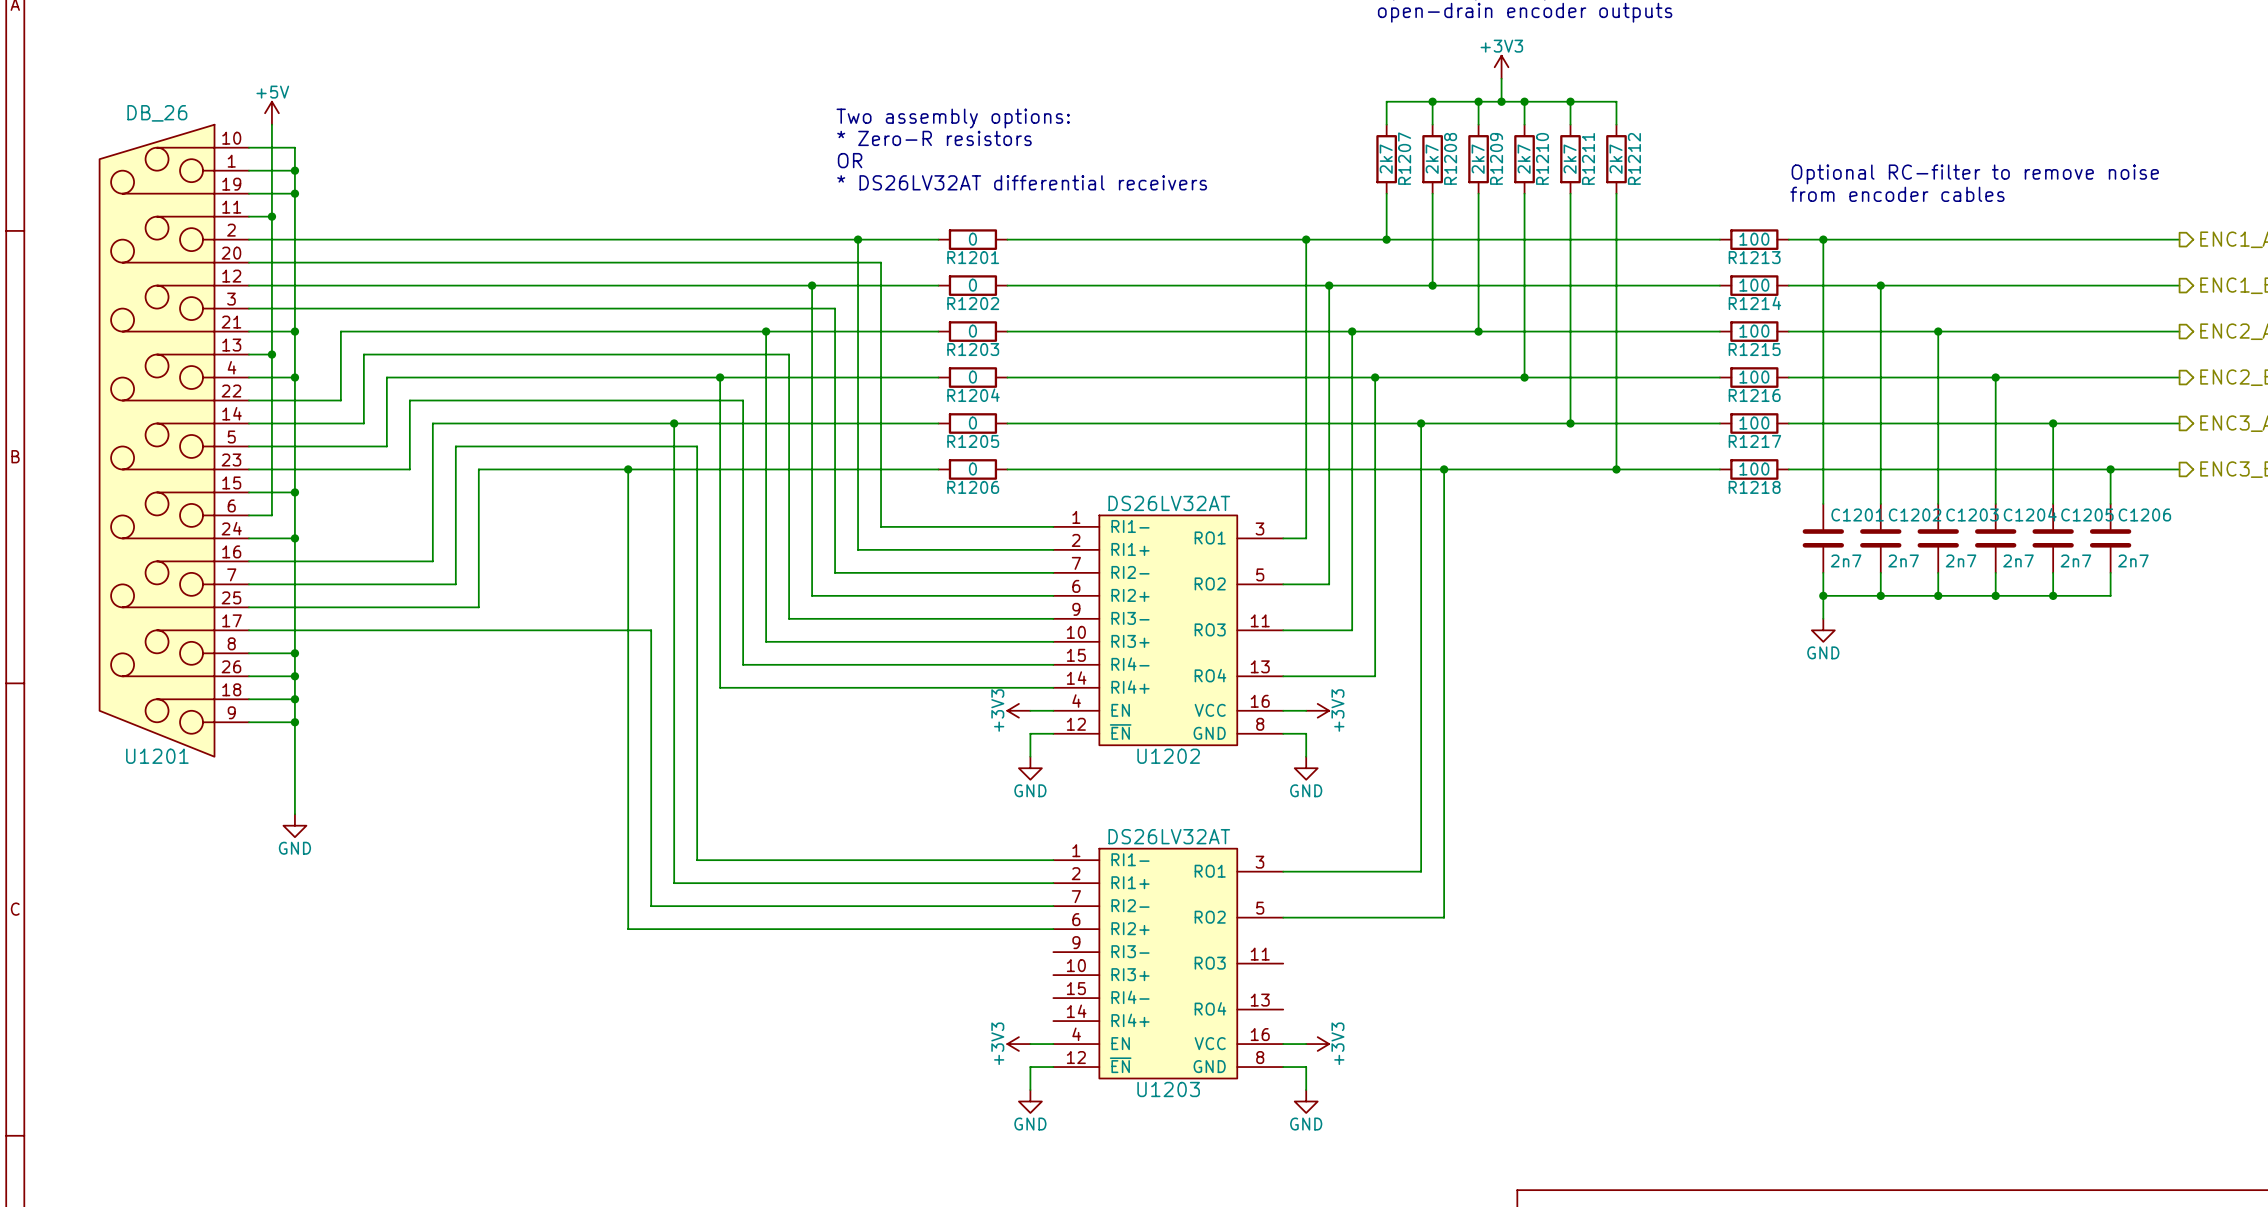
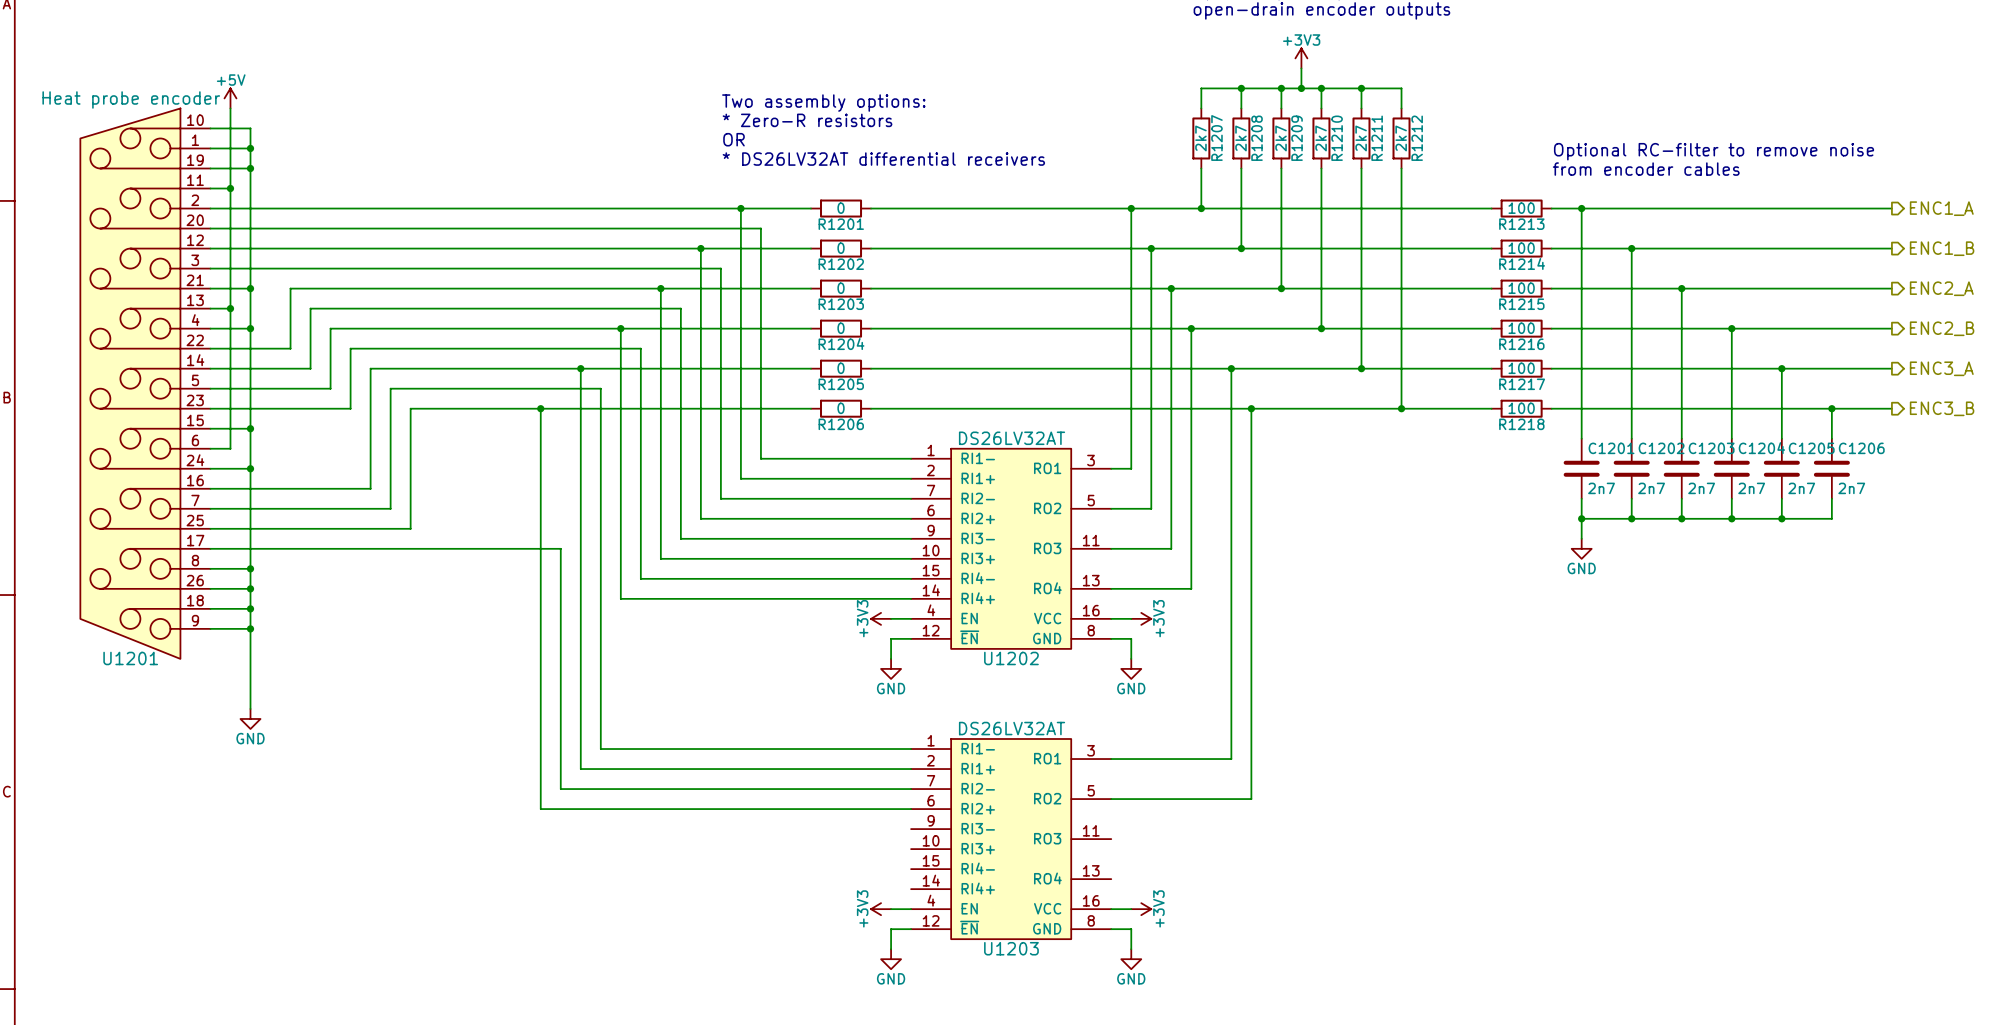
U1201 value: DB_26 (157, 113) -> Heat probe encoder (131, 99)

